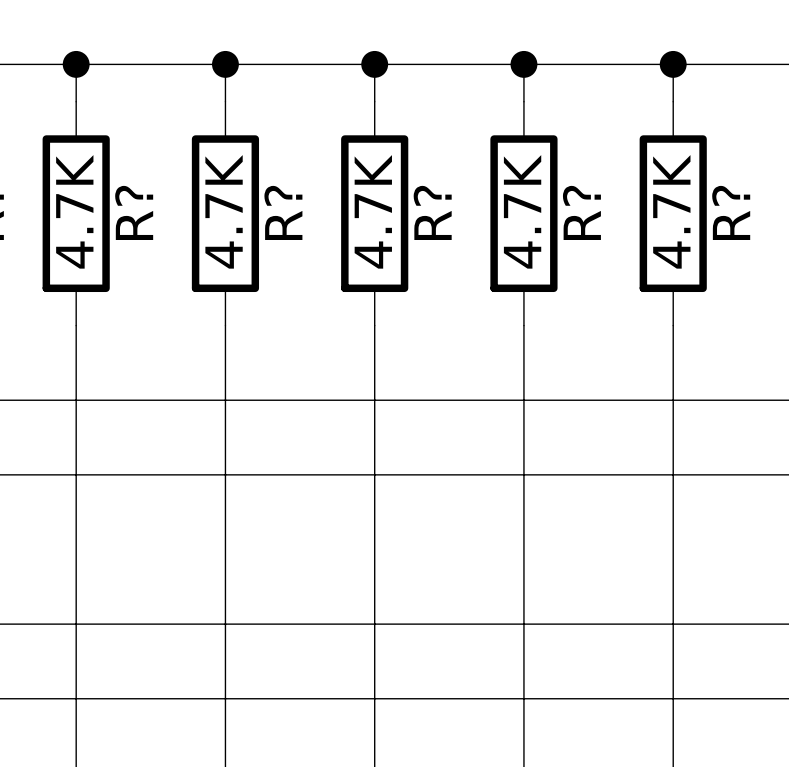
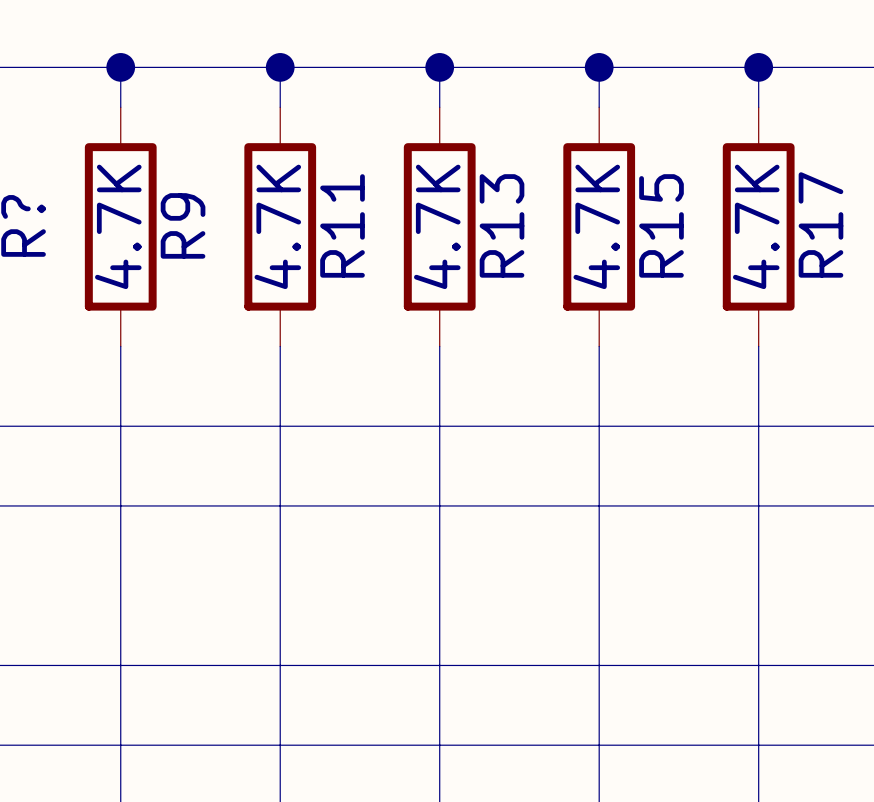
R? name: R? (134, 212) -> R9 (183, 225)
R? name: R? (283, 212) -> R11 (342, 225)
R? name: R? (432, 212) -> R13 (502, 225)
R? name: R? (581, 212) -> R15 (661, 225)
R? name: R? (731, 212) -> R17 (820, 224)

